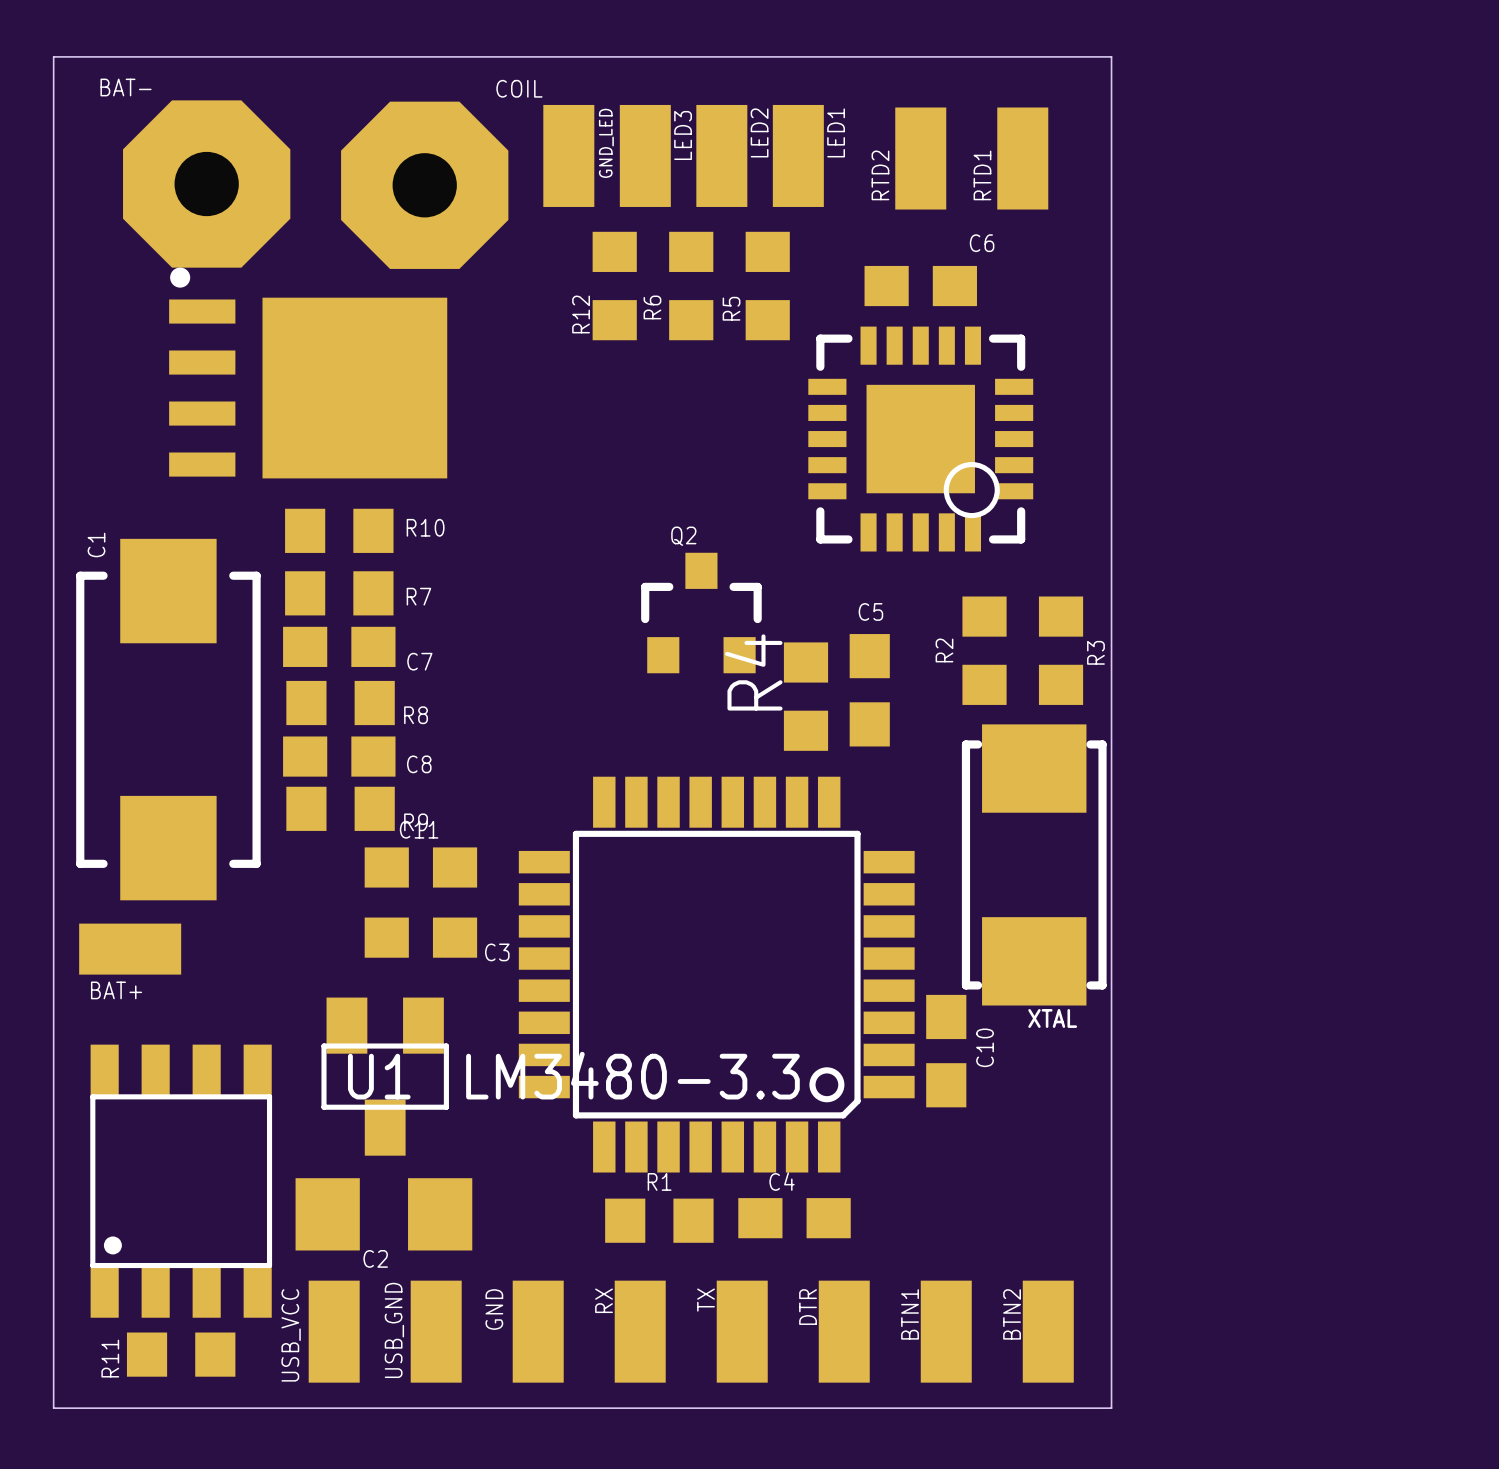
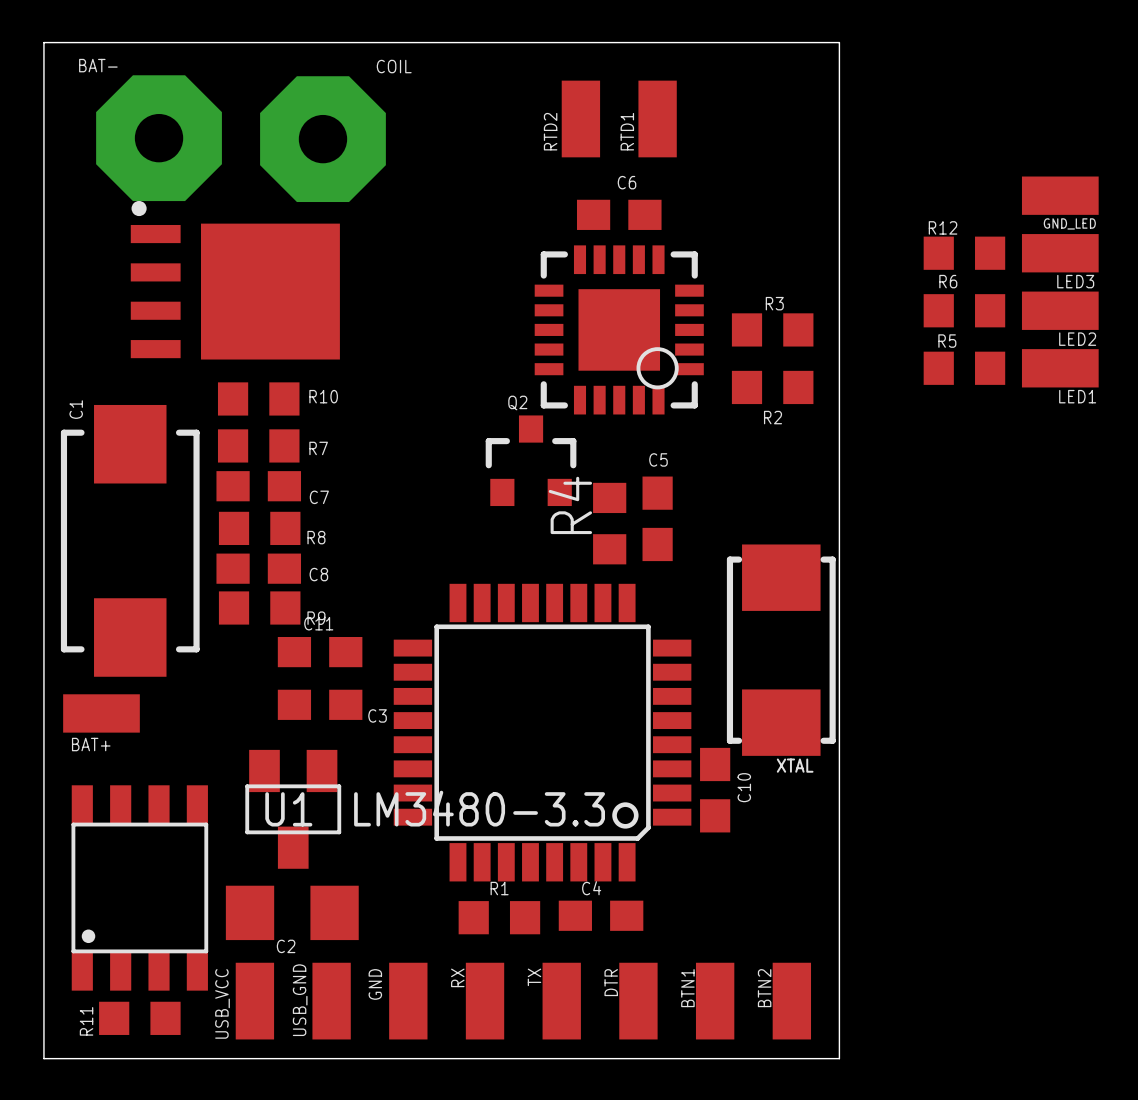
GND_LED rotation: 0° (568, 155) -> 90° clockwise (1060, 195)
GND_LED position: (568, 155) -> (1060, 195)
LED3 rotation: 0° (645, 155) -> 90° clockwise (1060, 253)
LED3 position: (645, 155) -> (1060, 253)
LED2 rotation: 0° (721, 155) -> 90° clockwise (1060, 310)
LED2 position: (721, 155) -> (1060, 310)
LED1 rotation: 0° (798, 155) -> 90° clockwise (1060, 368)
LED1 position: (798, 155) -> (1060, 368)
RTD2 position: (920, 158) -> (580, 118)
RTD1 position: (1022, 158) -> (657, 118)
C6 name position: C6 (982, 243) -> C6 (627, 182)
R12 rotation: 0° (614, 286) -> 90° clockwise (964, 253)
R12 position: (614, 286) -> (964, 253)
R6 rotation: 0° (691, 286) -> 90° clockwise (964, 310)
R6 position: (691, 286) -> (964, 310)
R5 rotation: 0° (767, 286) -> 90° clockwise (964, 368)
R5 position: (767, 286) -> (964, 368)
C6 position: (920, 286) -> (619, 214)
part position: (920, 439) -> (619, 329)
R2 rotation: 0° (984, 650) -> 90° clockwise (772, 387)
R2 position: (984, 650) -> (772, 387)
R3 rotation: 0° (1061, 650) -> 90° clockwise (772, 329)
R3 position: (1061, 650) -> (772, 329)

